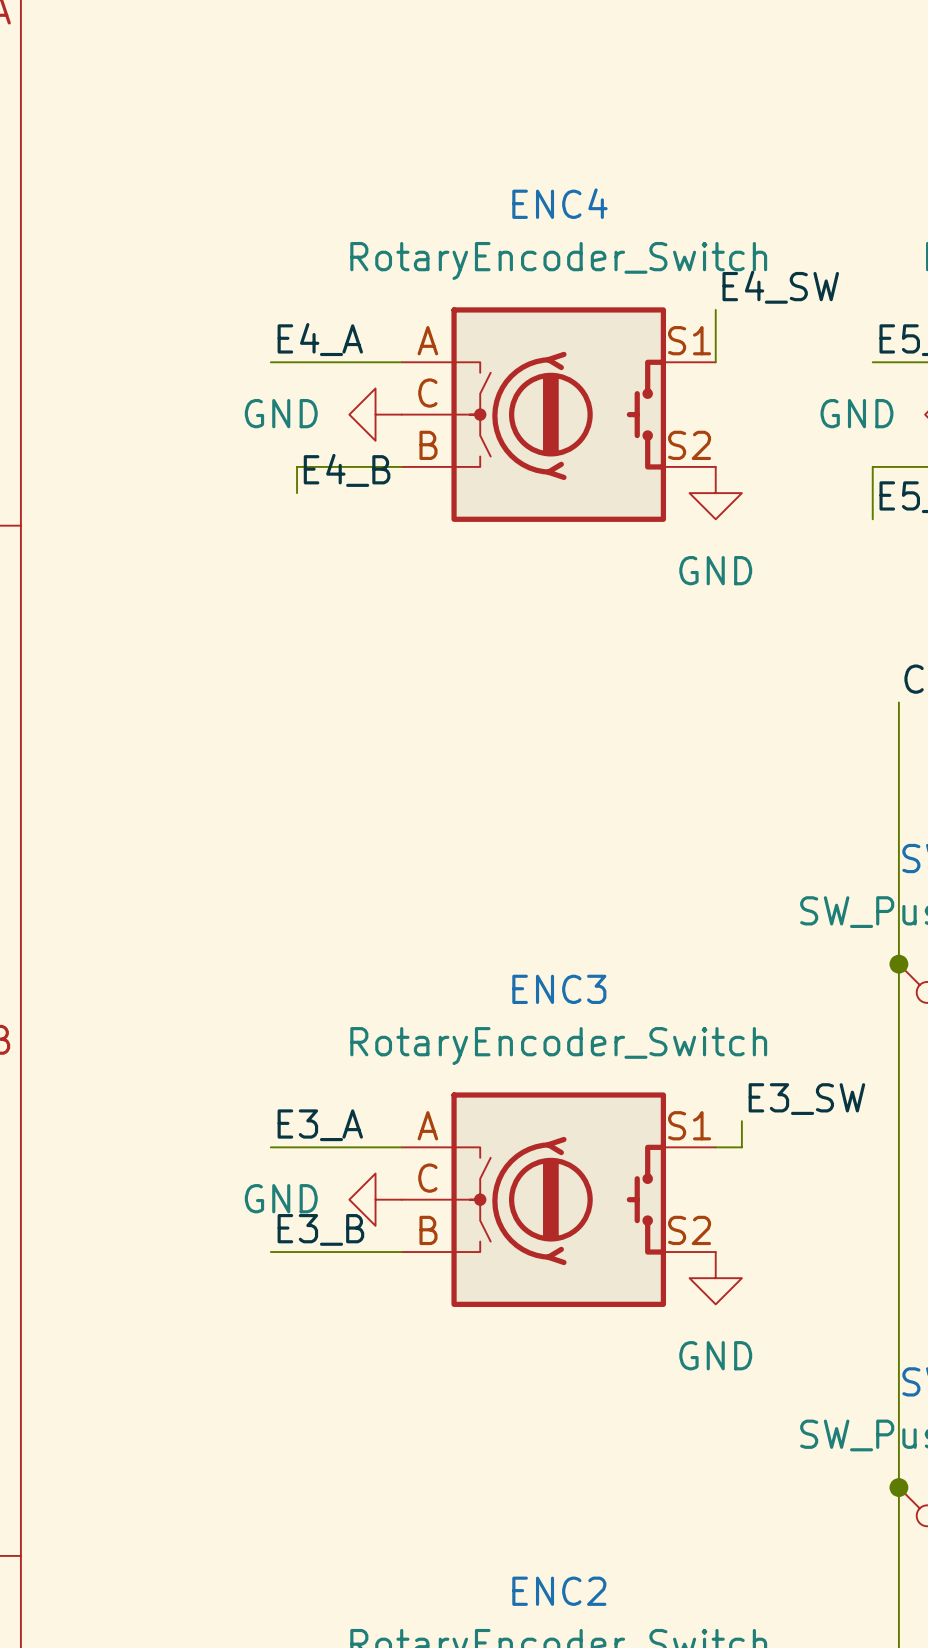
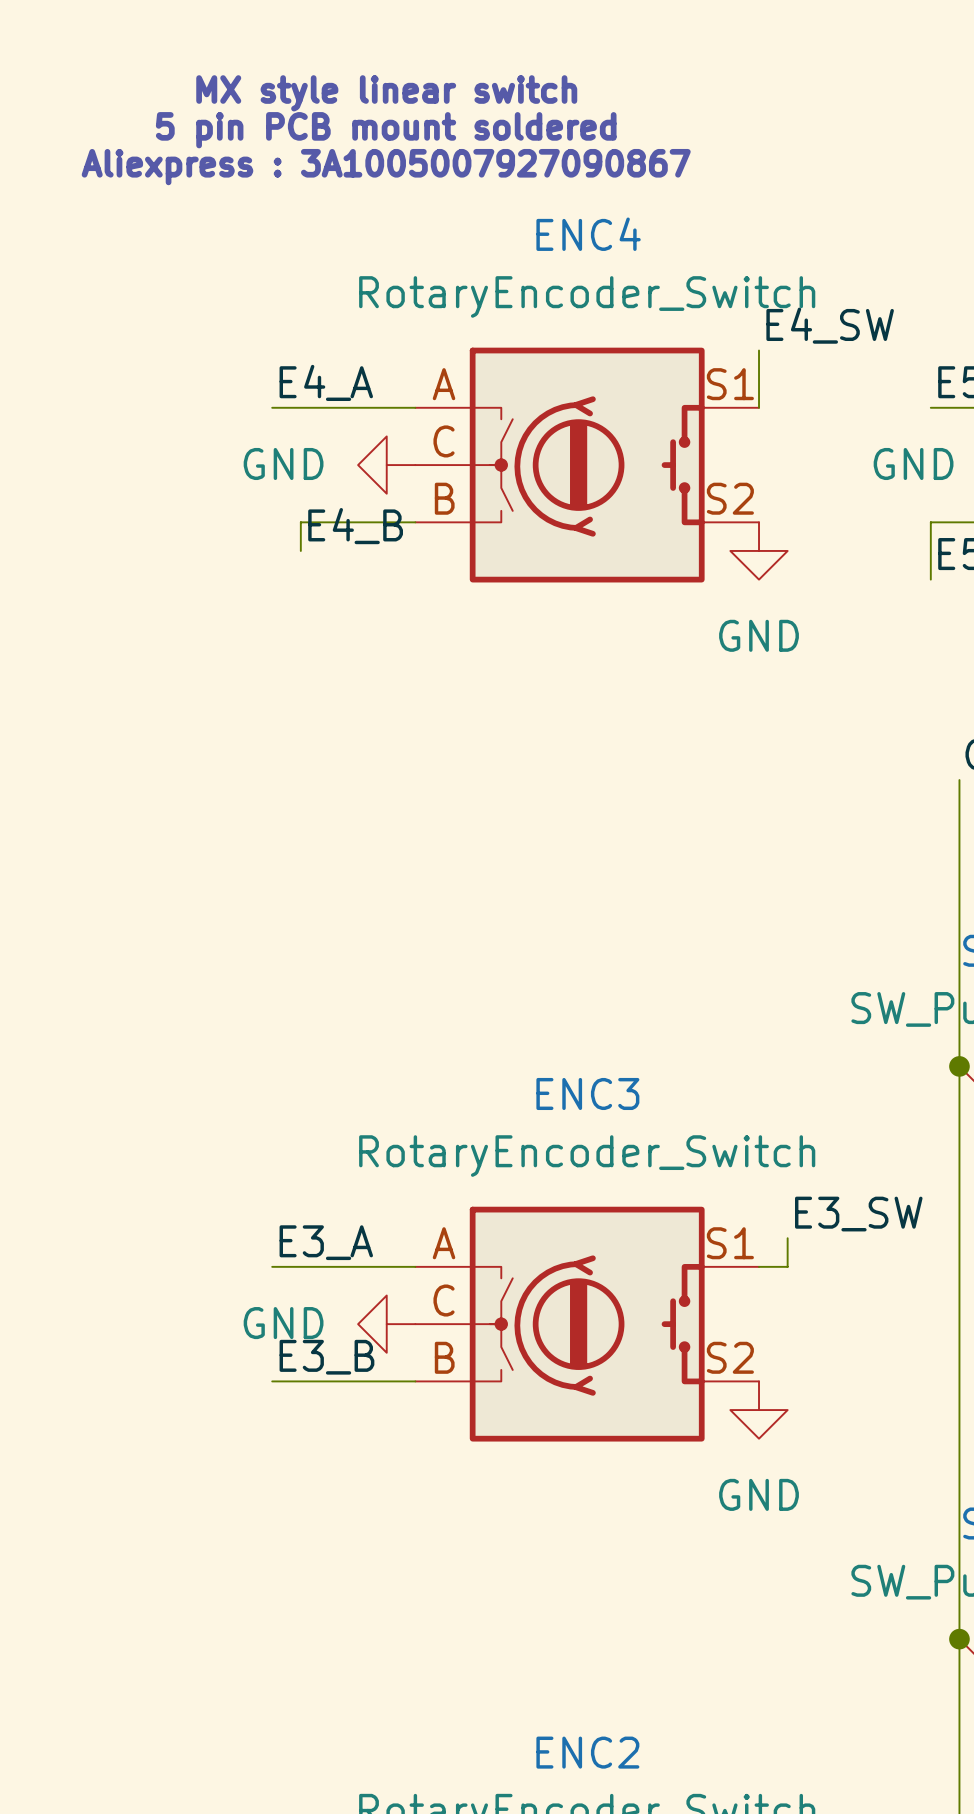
text: none -> MX style linear switch (386, 93)
text: none -> 5 pin PCB mount soldered (386, 130)
text: none -> Aliexpress : 3A1005007927090867 (386, 167)

